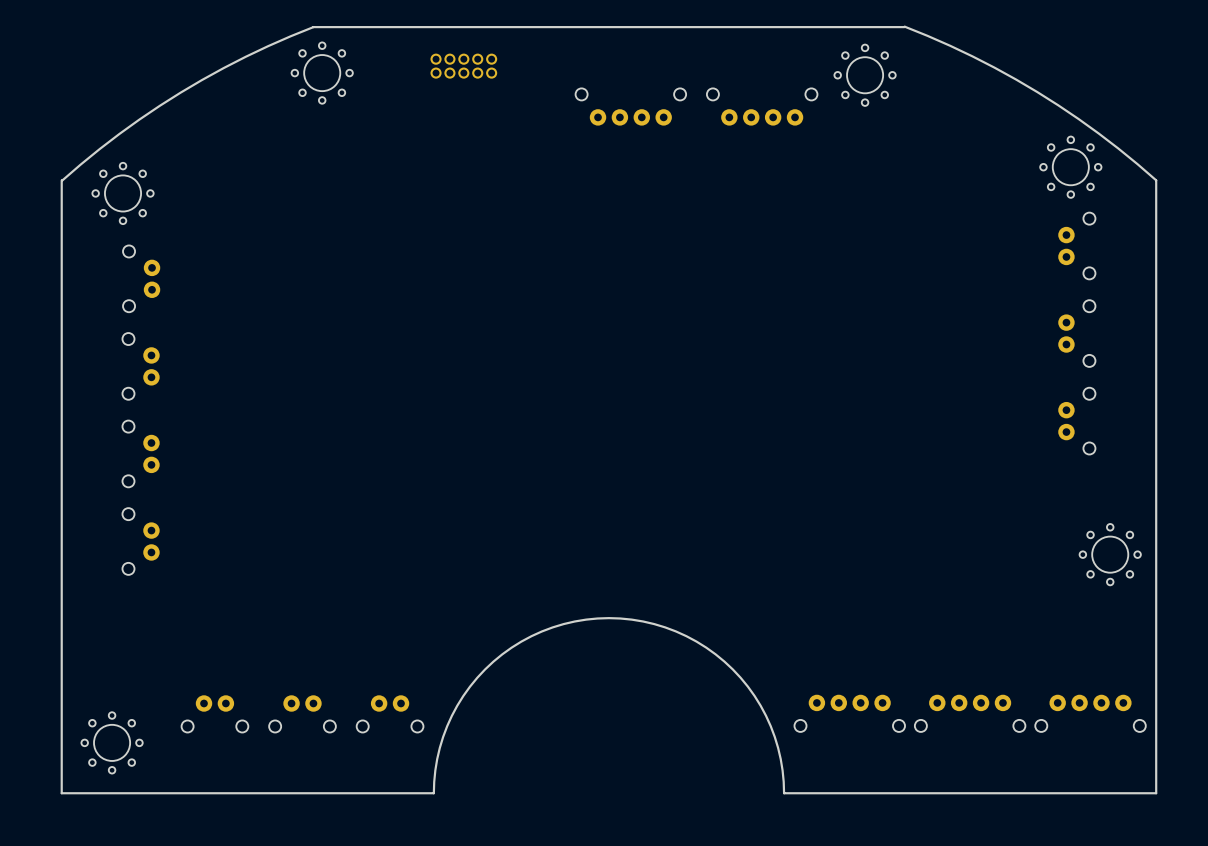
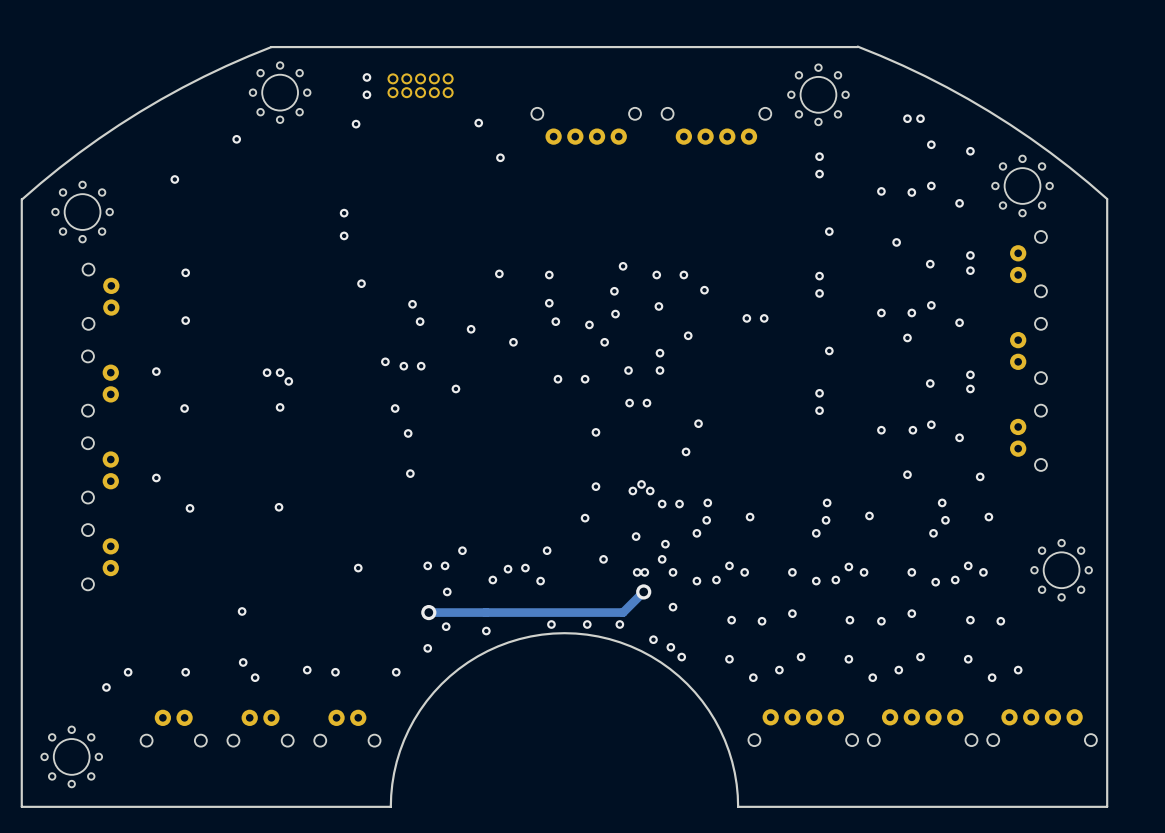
via: none -> (366, 77)
via: none -> (366, 94)
via: none -> (907, 118)
via: none -> (920, 118)
via: none -> (478, 123)
via: none -> (356, 124)
via: none -> (236, 139)
via: none -> (931, 144)
via: none -> (970, 151)
via: none -> (819, 156)
via: none -> (500, 157)
via: none -> (819, 174)
via: none -> (174, 179)
via: none -> (931, 185)
via: none -> (881, 191)
via: none -> (911, 192)
via: none -> (959, 203)
via: none -> (344, 213)
via: none -> (829, 231)
via: none -> (344, 235)
via: none -> (896, 242)
via: none -> (970, 255)
via: none -> (930, 264)
via: none -> (623, 266)
via: none -> (970, 270)
via: none -> (185, 272)
via: none -> (499, 273)
via: none -> (549, 275)
via: none -> (656, 275)
via: none -> (683, 275)
via: none -> (819, 276)
via: none -> (361, 283)
via: none -> (704, 290)
via: none -> (614, 291)
via: none -> (819, 293)
via: none -> (549, 303)
via: none -> (412, 304)
via: none -> (931, 305)
via: none -> (658, 306)
via: none -> (881, 312)
via: none -> (911, 312)
via: none -> (615, 314)
via: none -> (746, 318)
via: none -> (764, 318)
via: none -> (185, 320)
via: none -> (420, 321)
via: none -> (555, 321)
via: none -> (959, 322)
via: none -> (589, 324)
via: none -> (471, 329)
via: none -> (688, 335)
via: none -> (907, 337)
via: none -> (513, 342)
via: none -> (604, 342)
via: none -> (829, 350)
via: none -> (660, 353)
via: none -> (385, 361)
via: none -> (403, 366)
via: none -> (421, 366)
via: none -> (628, 370)
via: none -> (660, 370)
via: none -> (156, 371)
via: none -> (267, 372)
via: none -> (280, 372)
via: none -> (970, 374)
via: none -> (557, 379)
via: none -> (585, 379)
via: none -> (288, 381)
via: none -> (930, 383)
via: none -> (455, 388)
via: none -> (970, 388)
via: none -> (819, 393)
via: none -> (629, 403)
via: none -> (646, 403)
via: none -> (280, 407)
via: none -> (184, 408)
via: none -> (395, 408)
via: none -> (819, 410)
via: none -> (698, 423)
via: none -> (931, 424)
via: none -> (881, 430)
via: none -> (912, 430)
via: none -> (595, 432)
via: none -> (408, 433)
via: none -> (959, 437)
via: none -> (686, 451)
via: none -> (410, 473)
via: none -> (907, 474)
via: none -> (980, 476)
via: none -> (156, 477)
via: none -> (641, 484)
via: none -> (595, 486)
via: none -> (632, 490)
via: none -> (650, 490)
via: none -> (707, 502)
via: none -> (827, 502)
via: none -> (942, 502)
via: none -> (662, 504)
via: none -> (679, 504)
via: none -> (279, 507)
via: none -> (190, 508)
via: none -> (869, 515)
via: none -> (750, 517)
via: none -> (988, 517)
via: none -> (585, 518)
via: none -> (706, 520)
via: none -> (826, 520)
via: none -> (945, 520)
via: none -> (696, 533)
via: none -> (816, 533)
via: none -> (933, 533)
via: none -> (636, 536)
via: none -> (665, 544)
via: none -> (462, 550)
via: none -> (547, 550)
via: none -> (603, 559)
via: none -> (662, 559)
via: none -> (427, 565)
via: none -> (445, 565)
via: none -> (729, 565)
via: none -> (968, 565)
via: none -> (848, 566)
via: none -> (358, 568)
via: none -> (525, 568)
via: none -> (508, 569)
via: none -> (637, 572)
via: none -> (644, 572)
via: none -> (673, 572)
via: none -> (744, 572)
via: none -> (792, 572)
via: none -> (864, 572)
via: none -> (911, 572)
via: none -> (983, 572)
via: none -> (492, 579)
via: none -> (716, 579)
via: none -> (835, 579)
via: none -> (955, 579)
via: none -> (540, 581)
via: none -> (696, 581)
via: none -> (816, 581)
via: none -> (935, 582)
via: none -> (447, 591)
track: none -> (643, 591) (623, 612) (428, 612)
via: none -> (643, 591)
via: none -> (673, 607)
via: none -> (242, 611)
via: none -> (428, 612)
via: none -> (792, 613)
via: none -> (911, 613)
via: none -> (731, 620)
via: none -> (849, 620)
via: none -> (970, 620)
via: none -> (762, 621)
via: none -> (881, 621)
via: none -> (1000, 621)
via: none -> (551, 624)
via: none -> (587, 624)
via: none -> (619, 624)
via: none -> (446, 626)
via: none -> (486, 631)
via: none -> (653, 639)
via: none -> (670, 647)
via: none -> (427, 648)
via: none -> (681, 657)
via: none -> (801, 657)
via: none -> (920, 657)
via: none -> (729, 659)
via: none -> (848, 659)
via: none -> (968, 659)
via: none -> (243, 662)
via: none -> (307, 670)
via: none -> (779, 670)
via: none -> (898, 670)
via: none -> (1018, 670)
via: none -> (128, 672)
via: none -> (185, 672)
via: none -> (335, 672)
via: none -> (396, 672)
via: none -> (255, 677)
via: none -> (753, 677)
via: none -> (872, 677)
via: none -> (992, 677)
via: none -> (106, 687)

